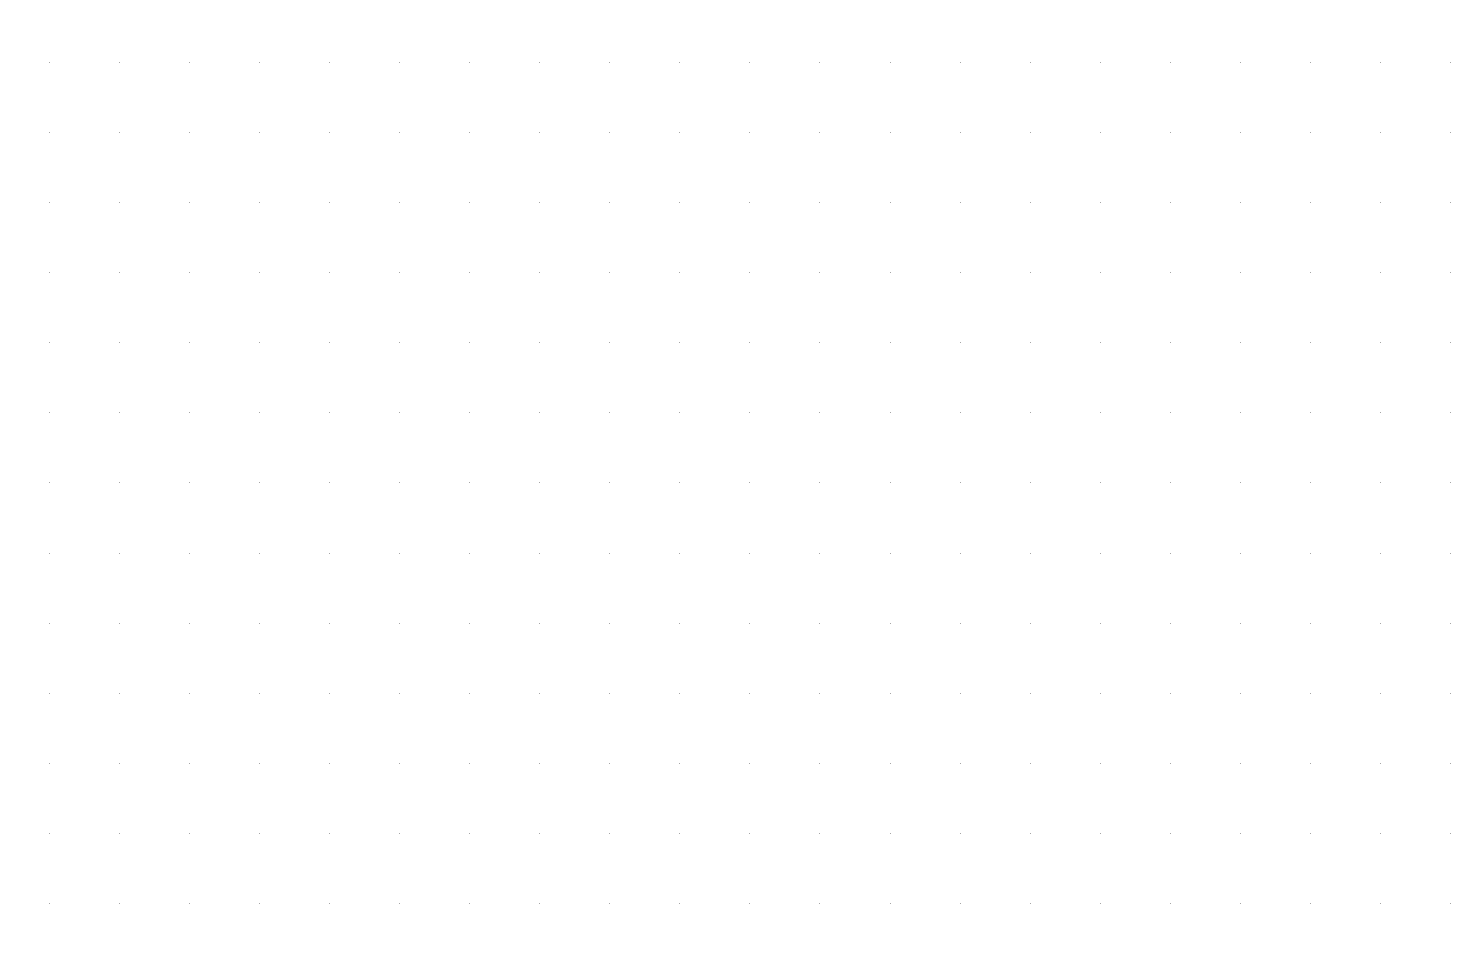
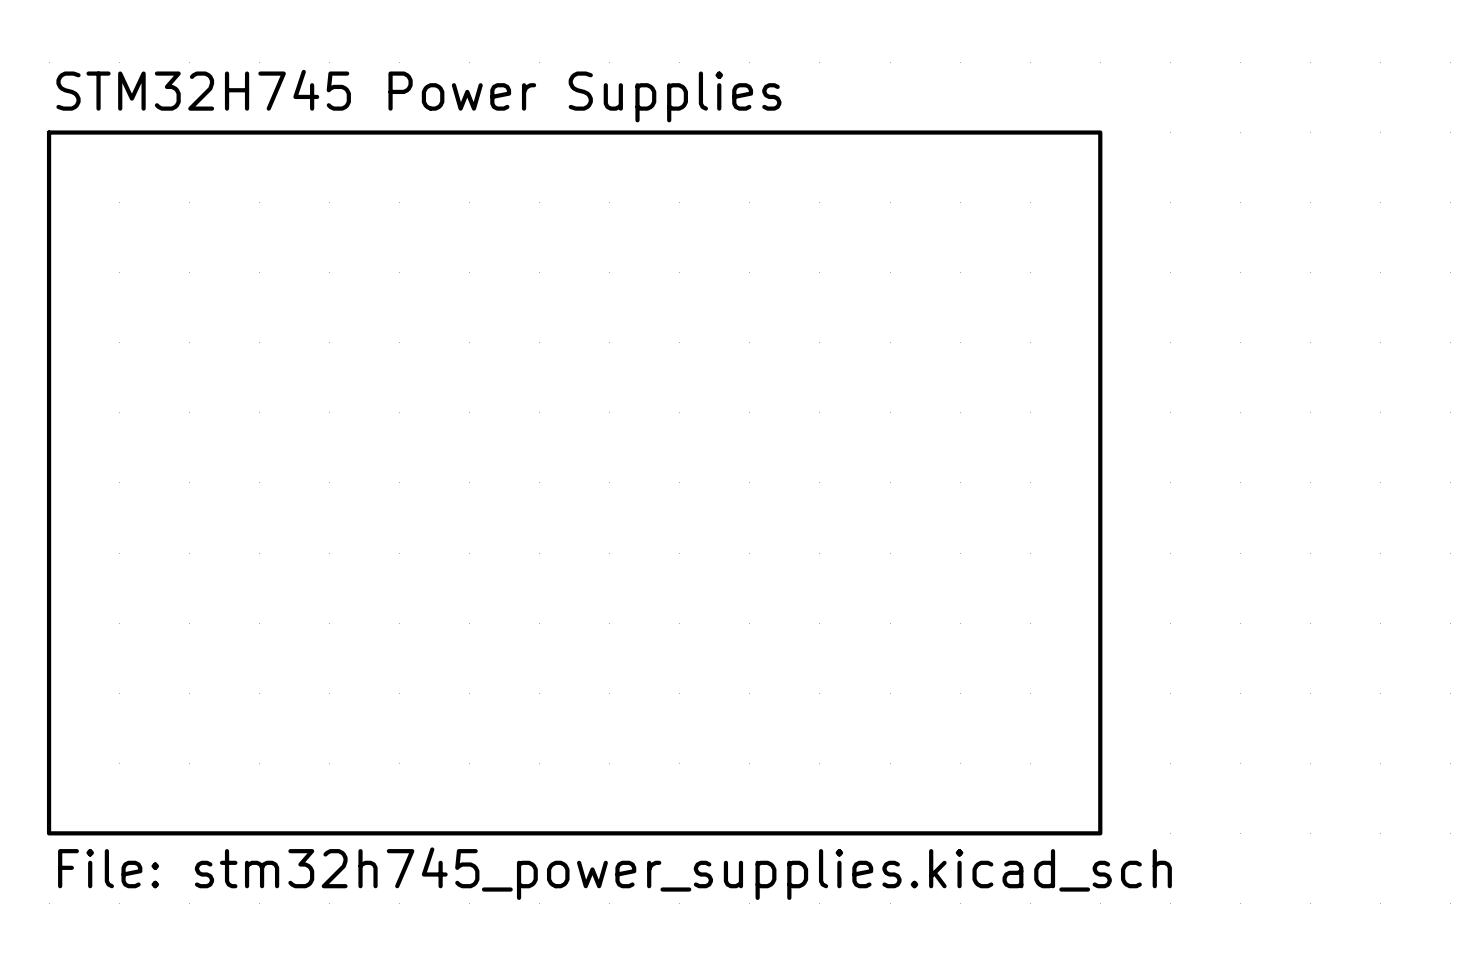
sheet STM32H745 Power Supplies: none -> File: stm32h745_power_supplies.kicad_sch (574, 482)

